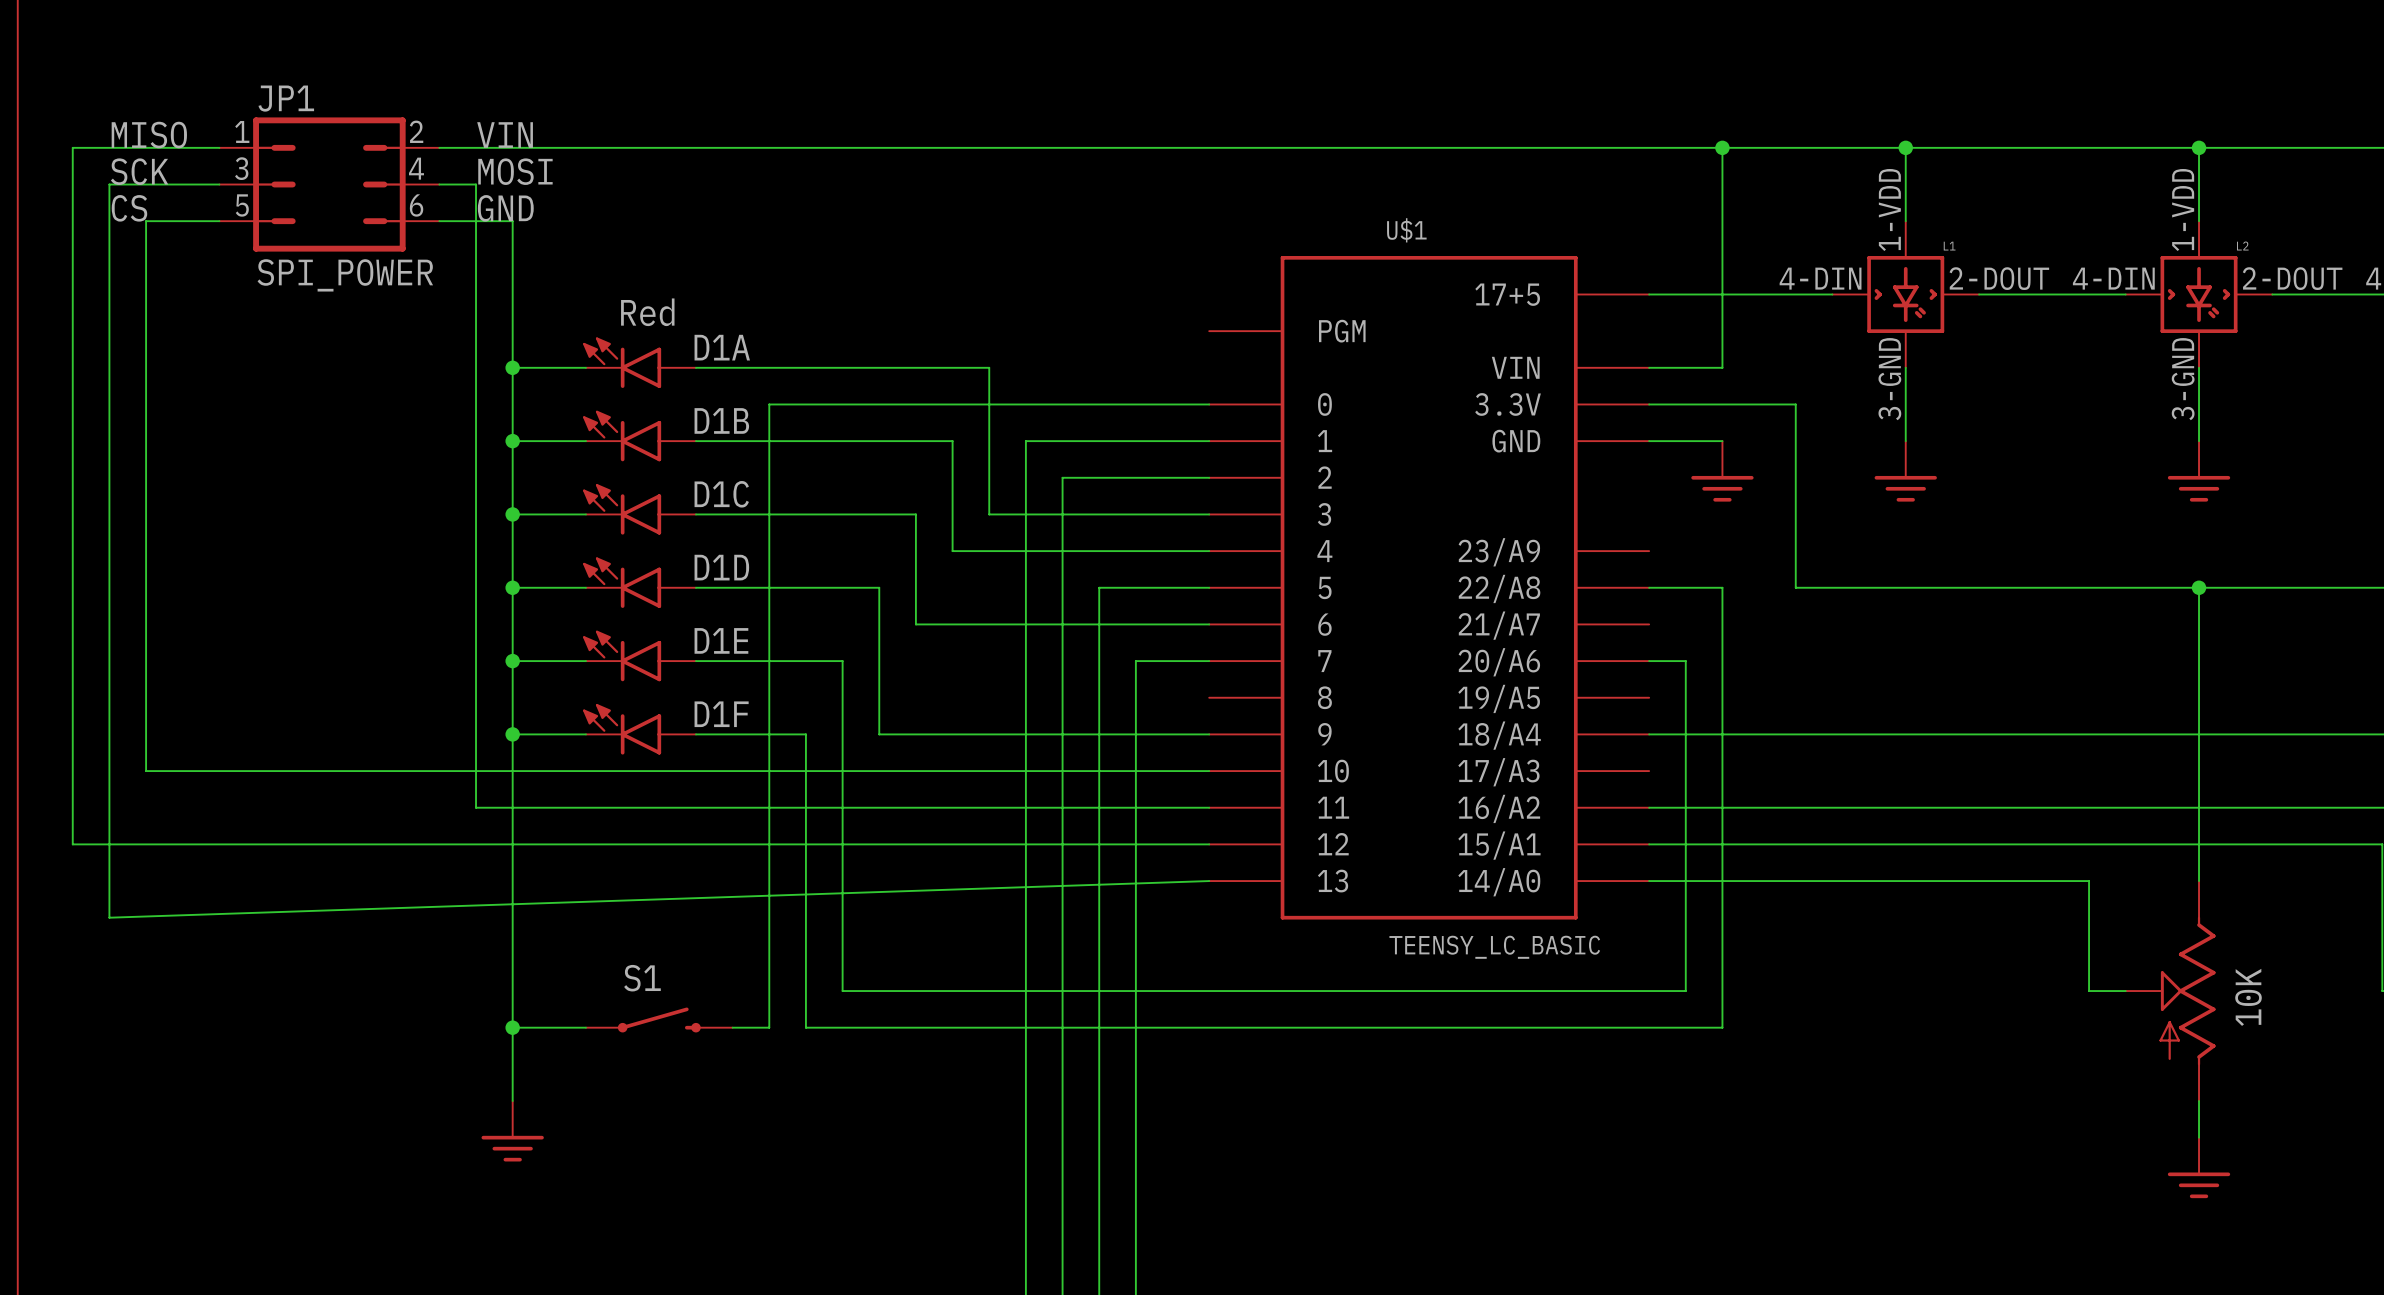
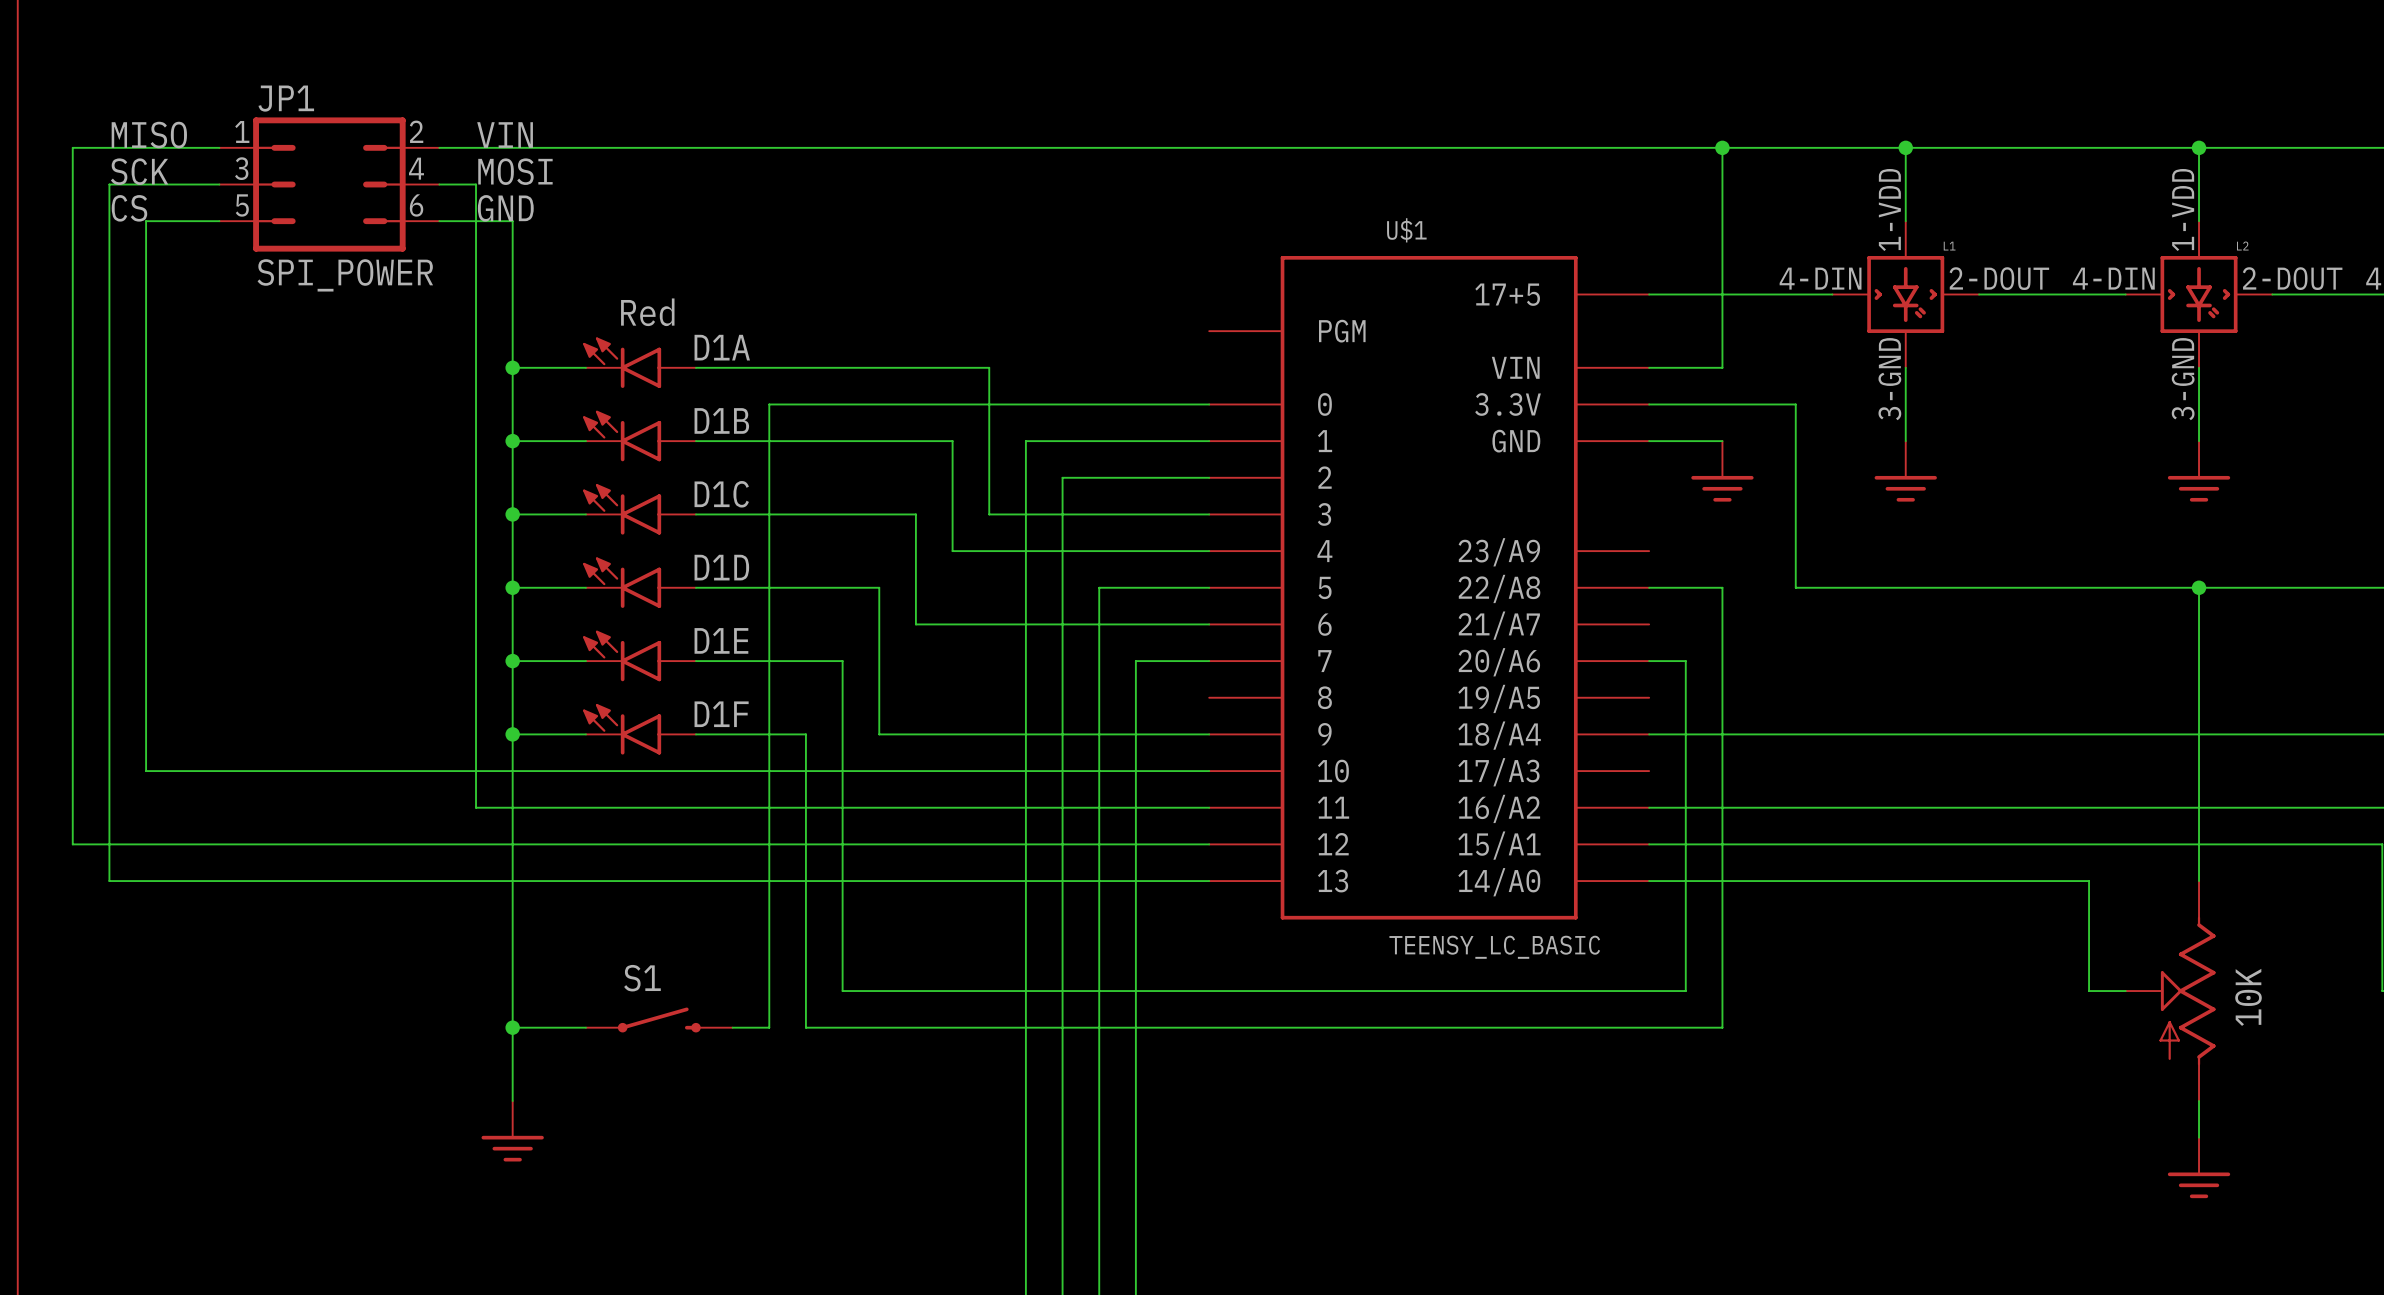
wire: (109, 881) (109, 917) (1209, 881) -> (109, 881) (1209, 881)

